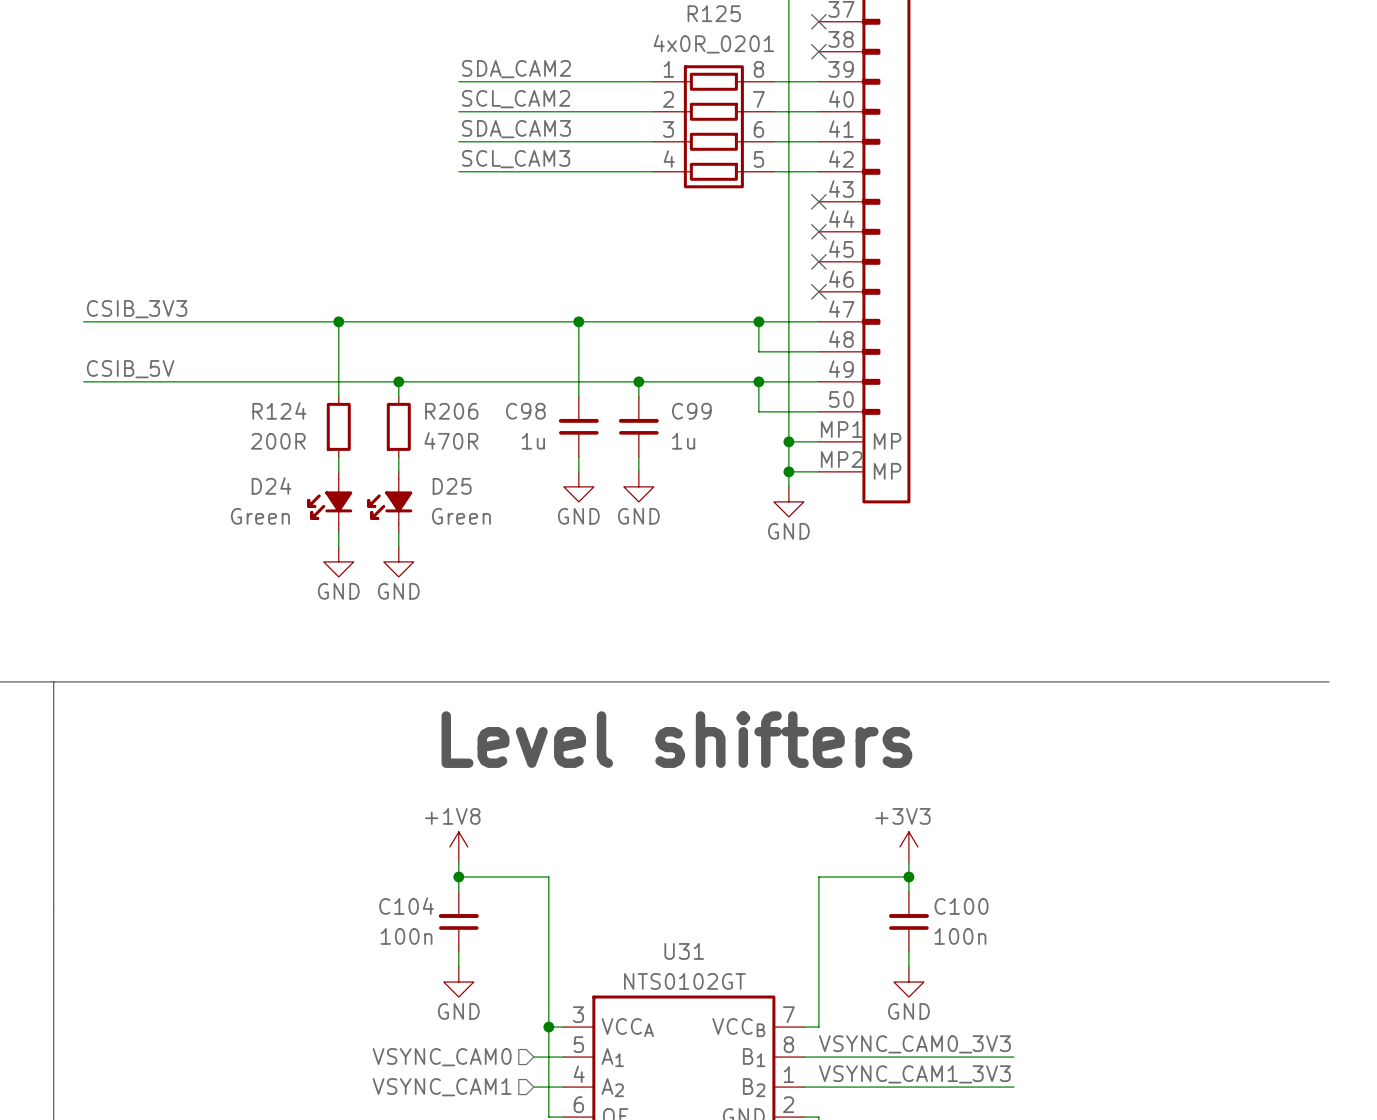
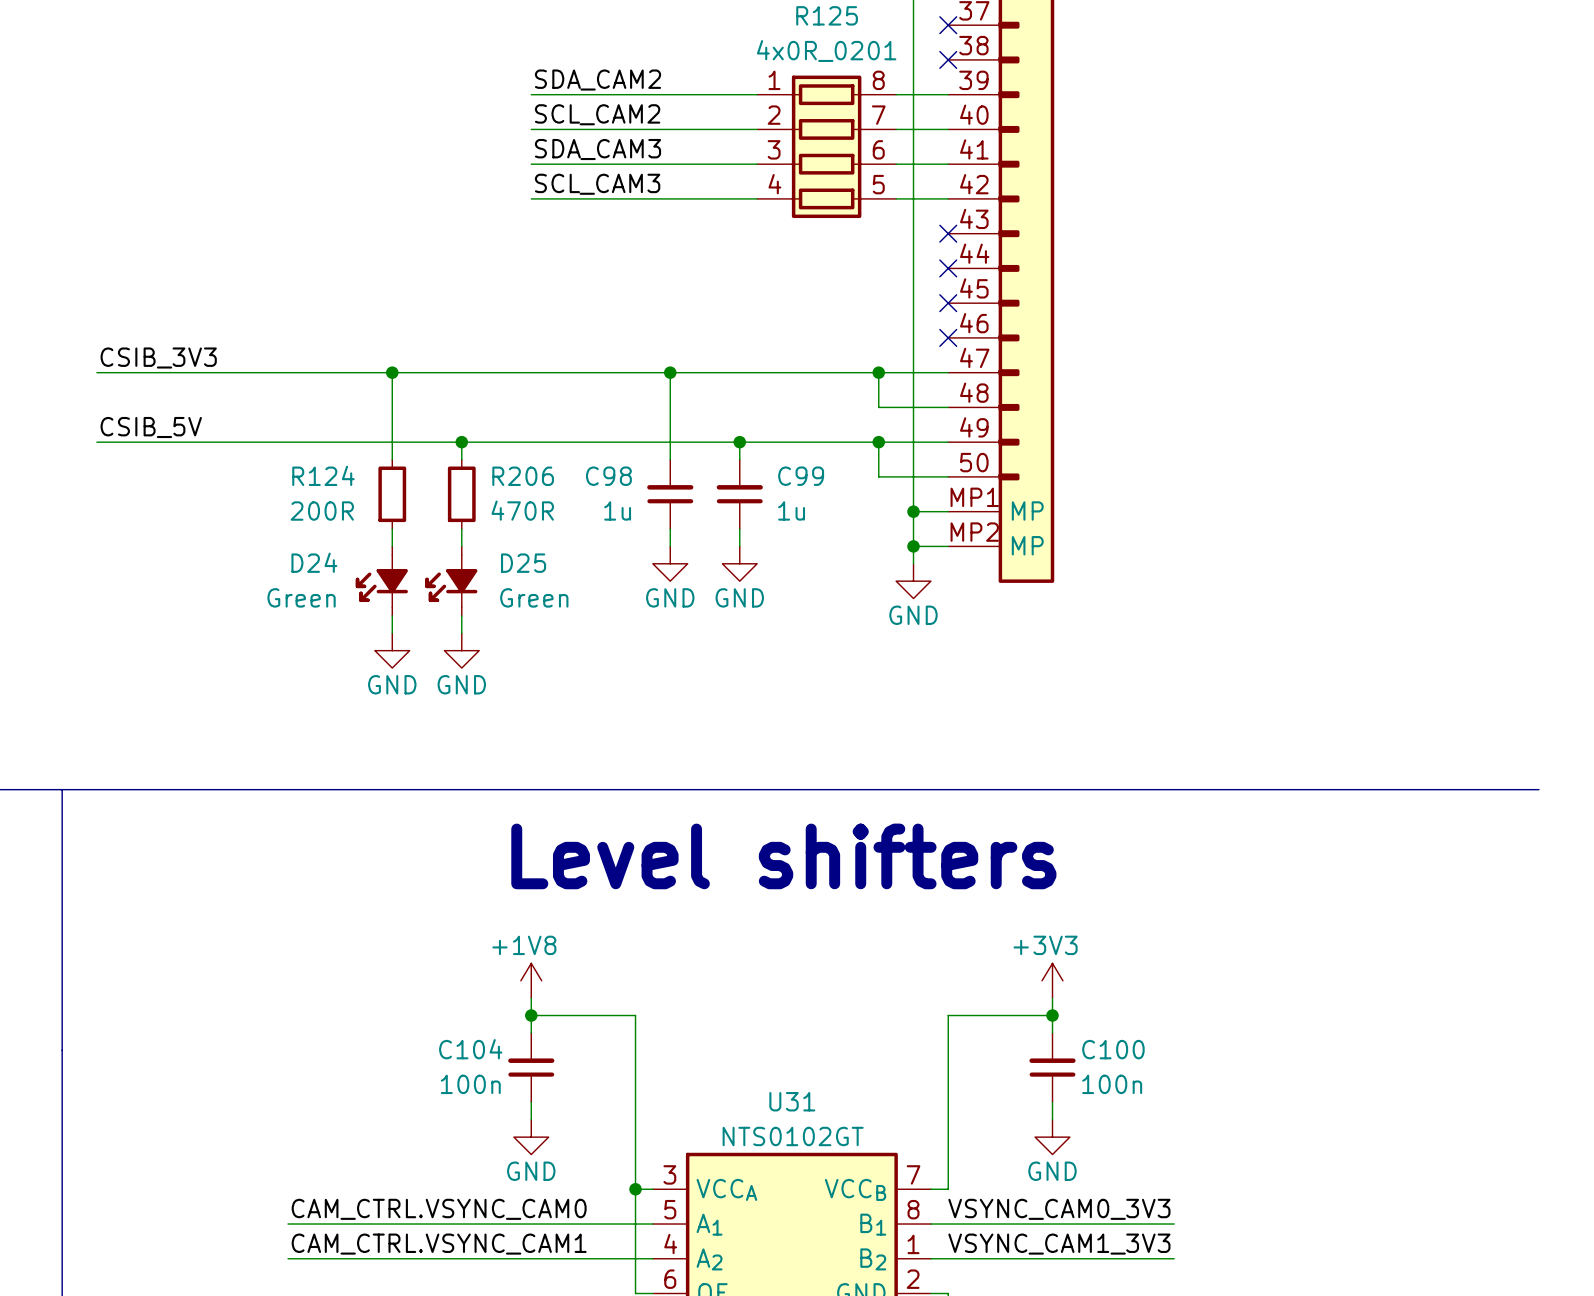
label: none -> CAM_CTRL.VSYNC_CAM0 (439, 1209)
wire: none -> (288, 1224) (618, 1224)
hierarchical label: VSYNC_CAM0 (442, 1057) -> none
label: none -> CAM_CTRL.VSYNC_CAM1 (439, 1244)
wire: none -> (288, 1258) (618, 1258)
hierarchical label: VSYNC_CAM1 (442, 1087) -> none

